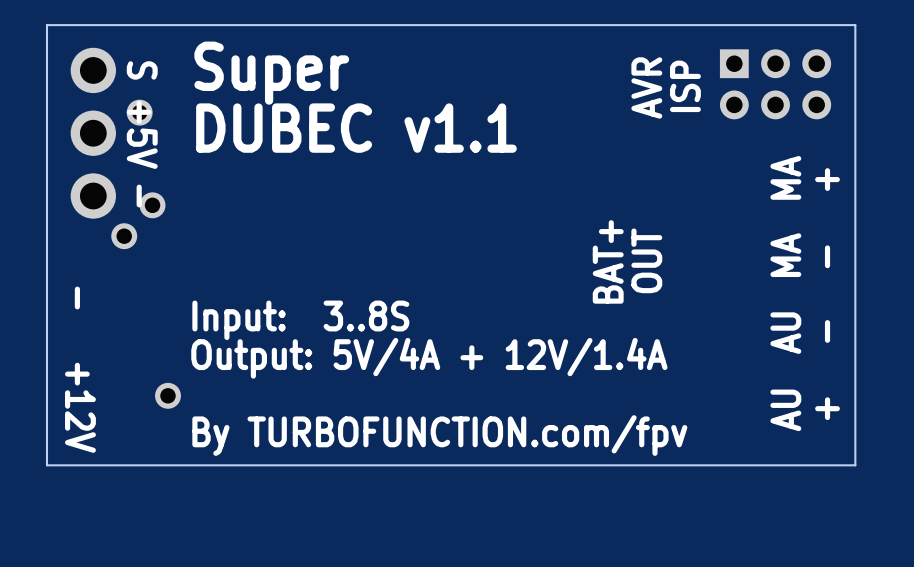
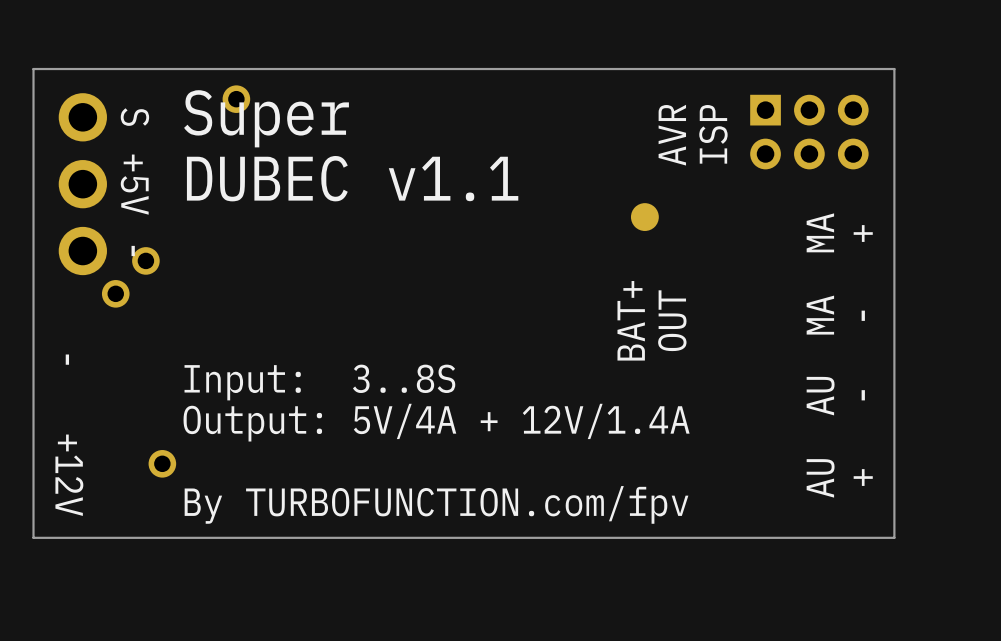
part position: (139, 112) -> (236, 99)
part: none -> (644, 217)

